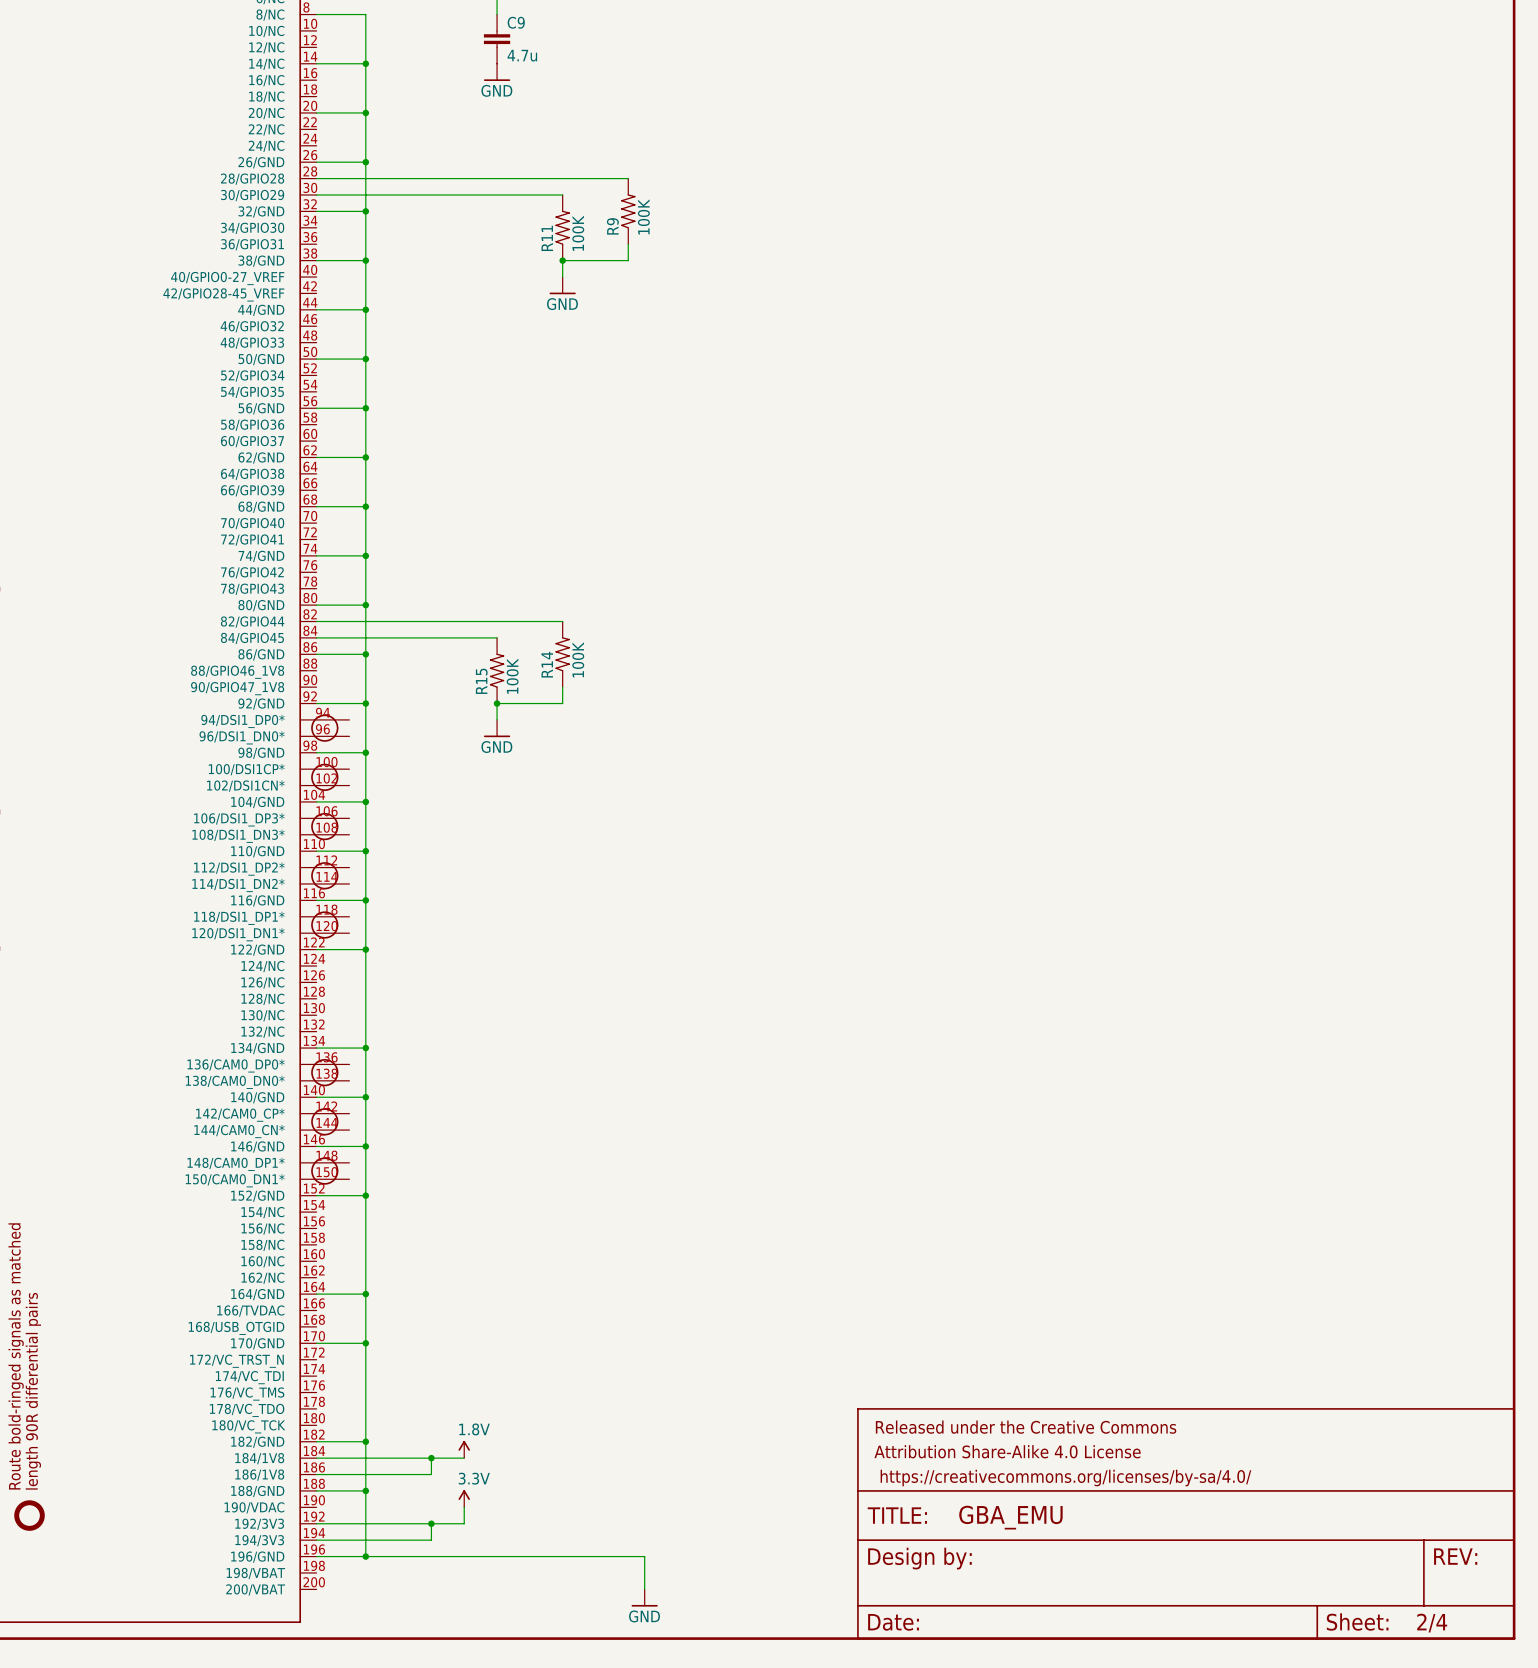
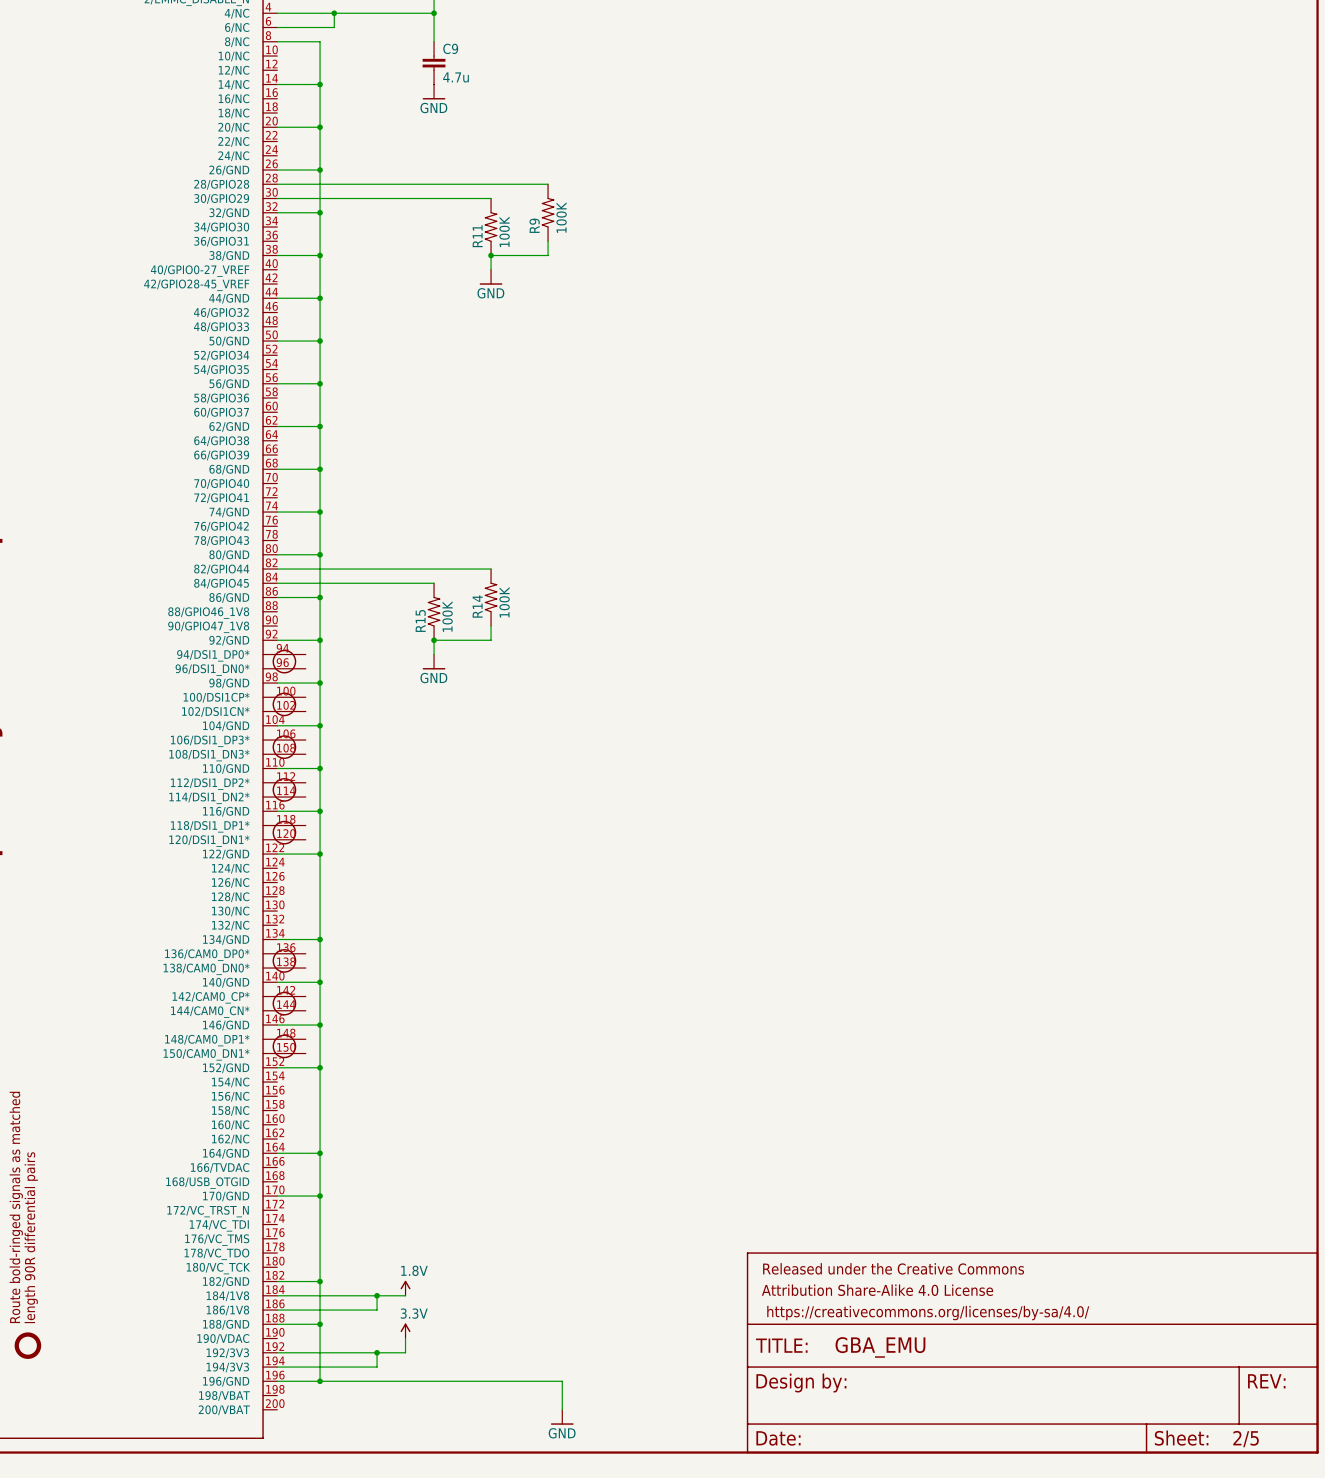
part text: 2/4 (1432, 1623) -> 2/5 (1246, 1439)

